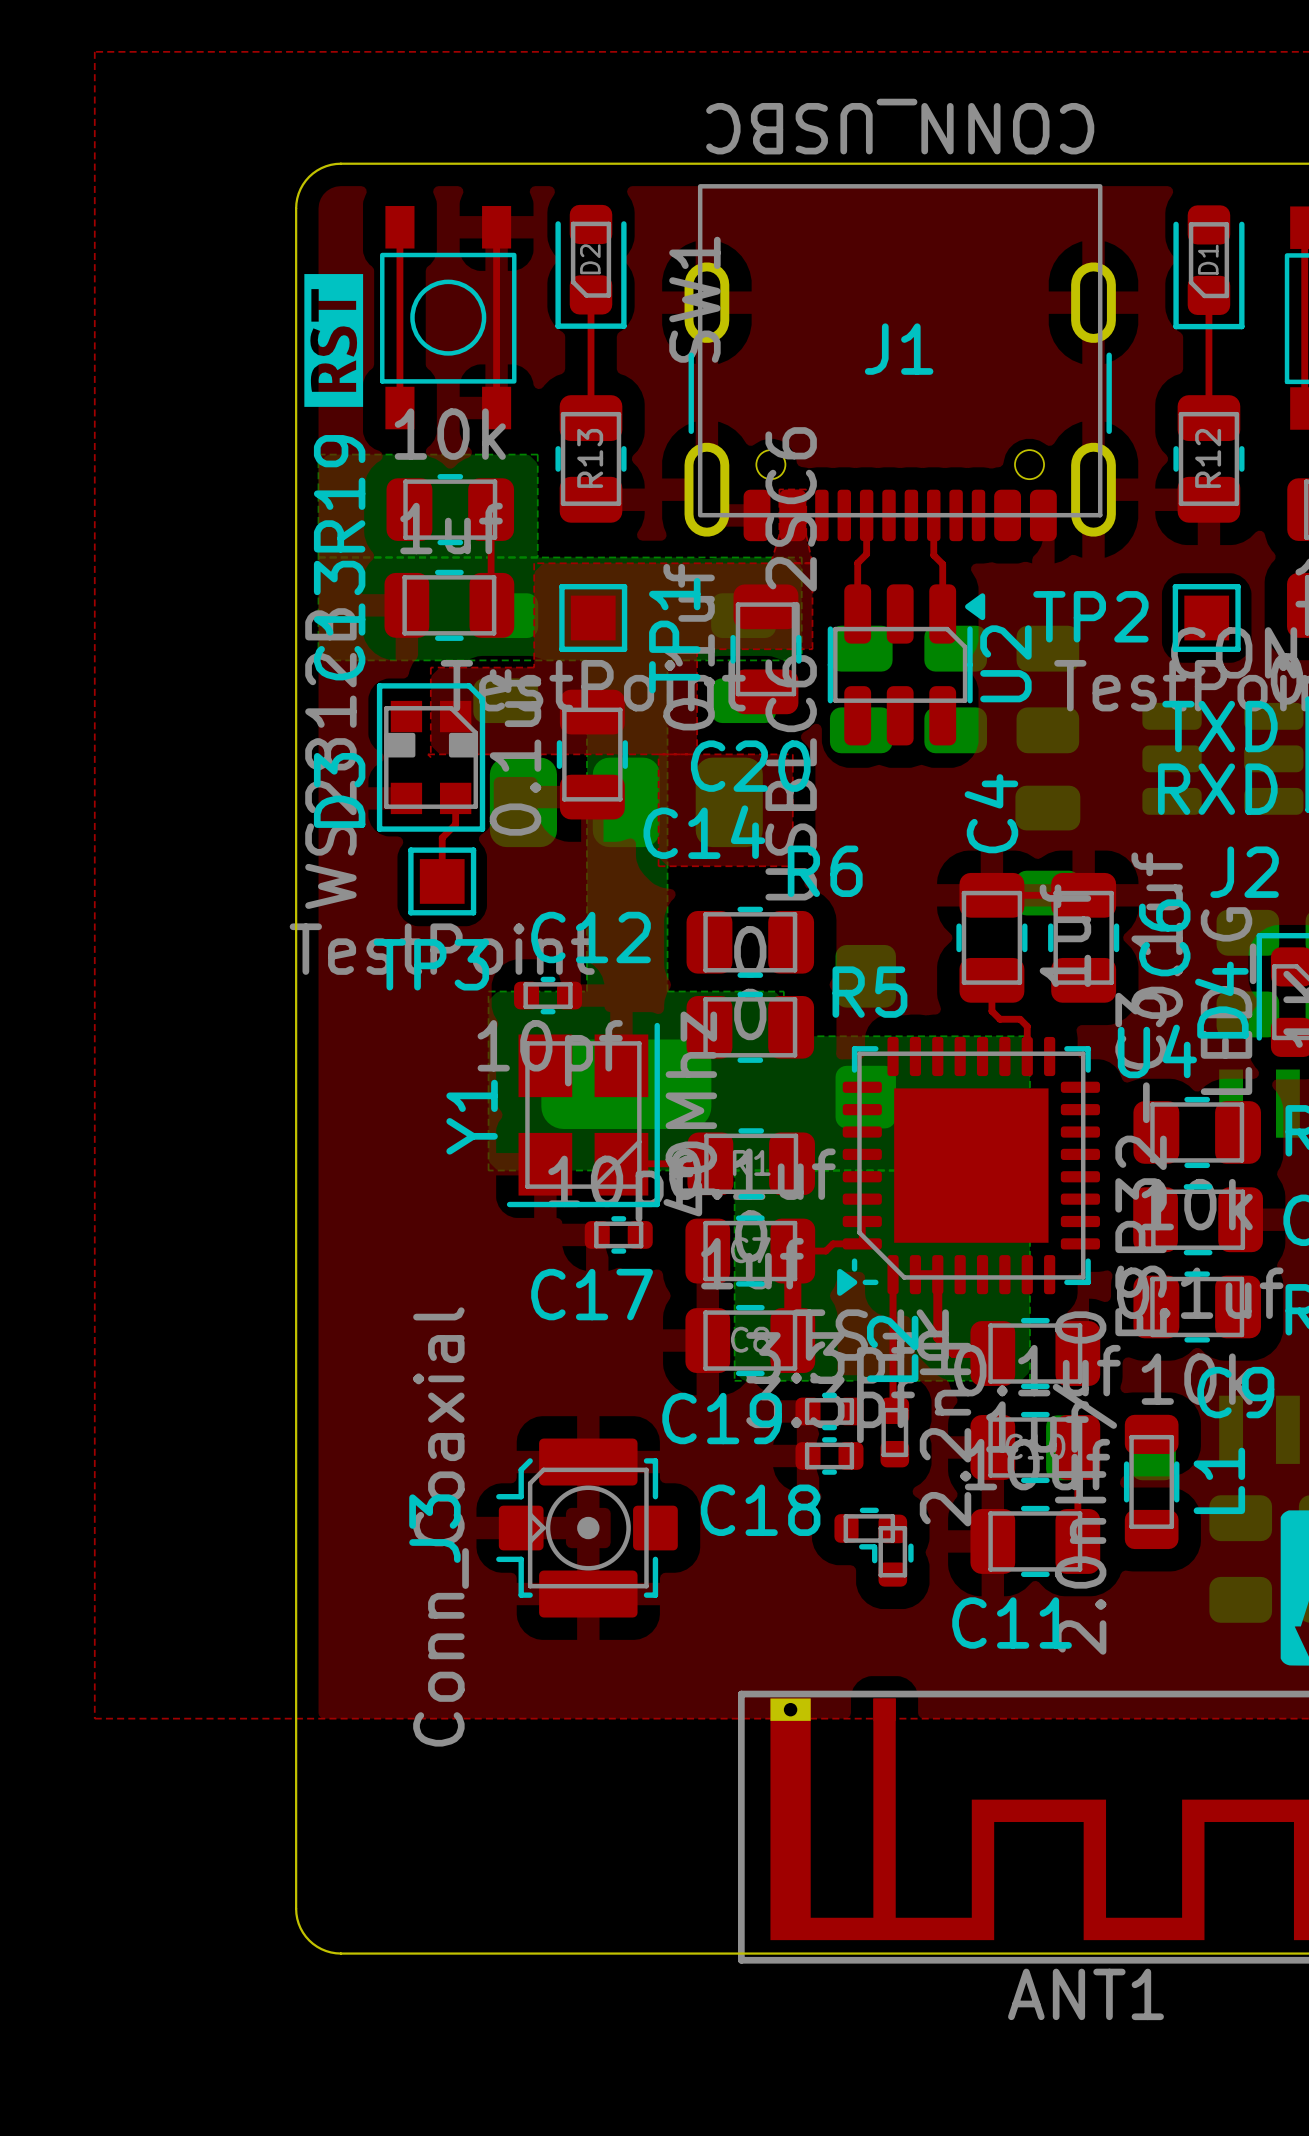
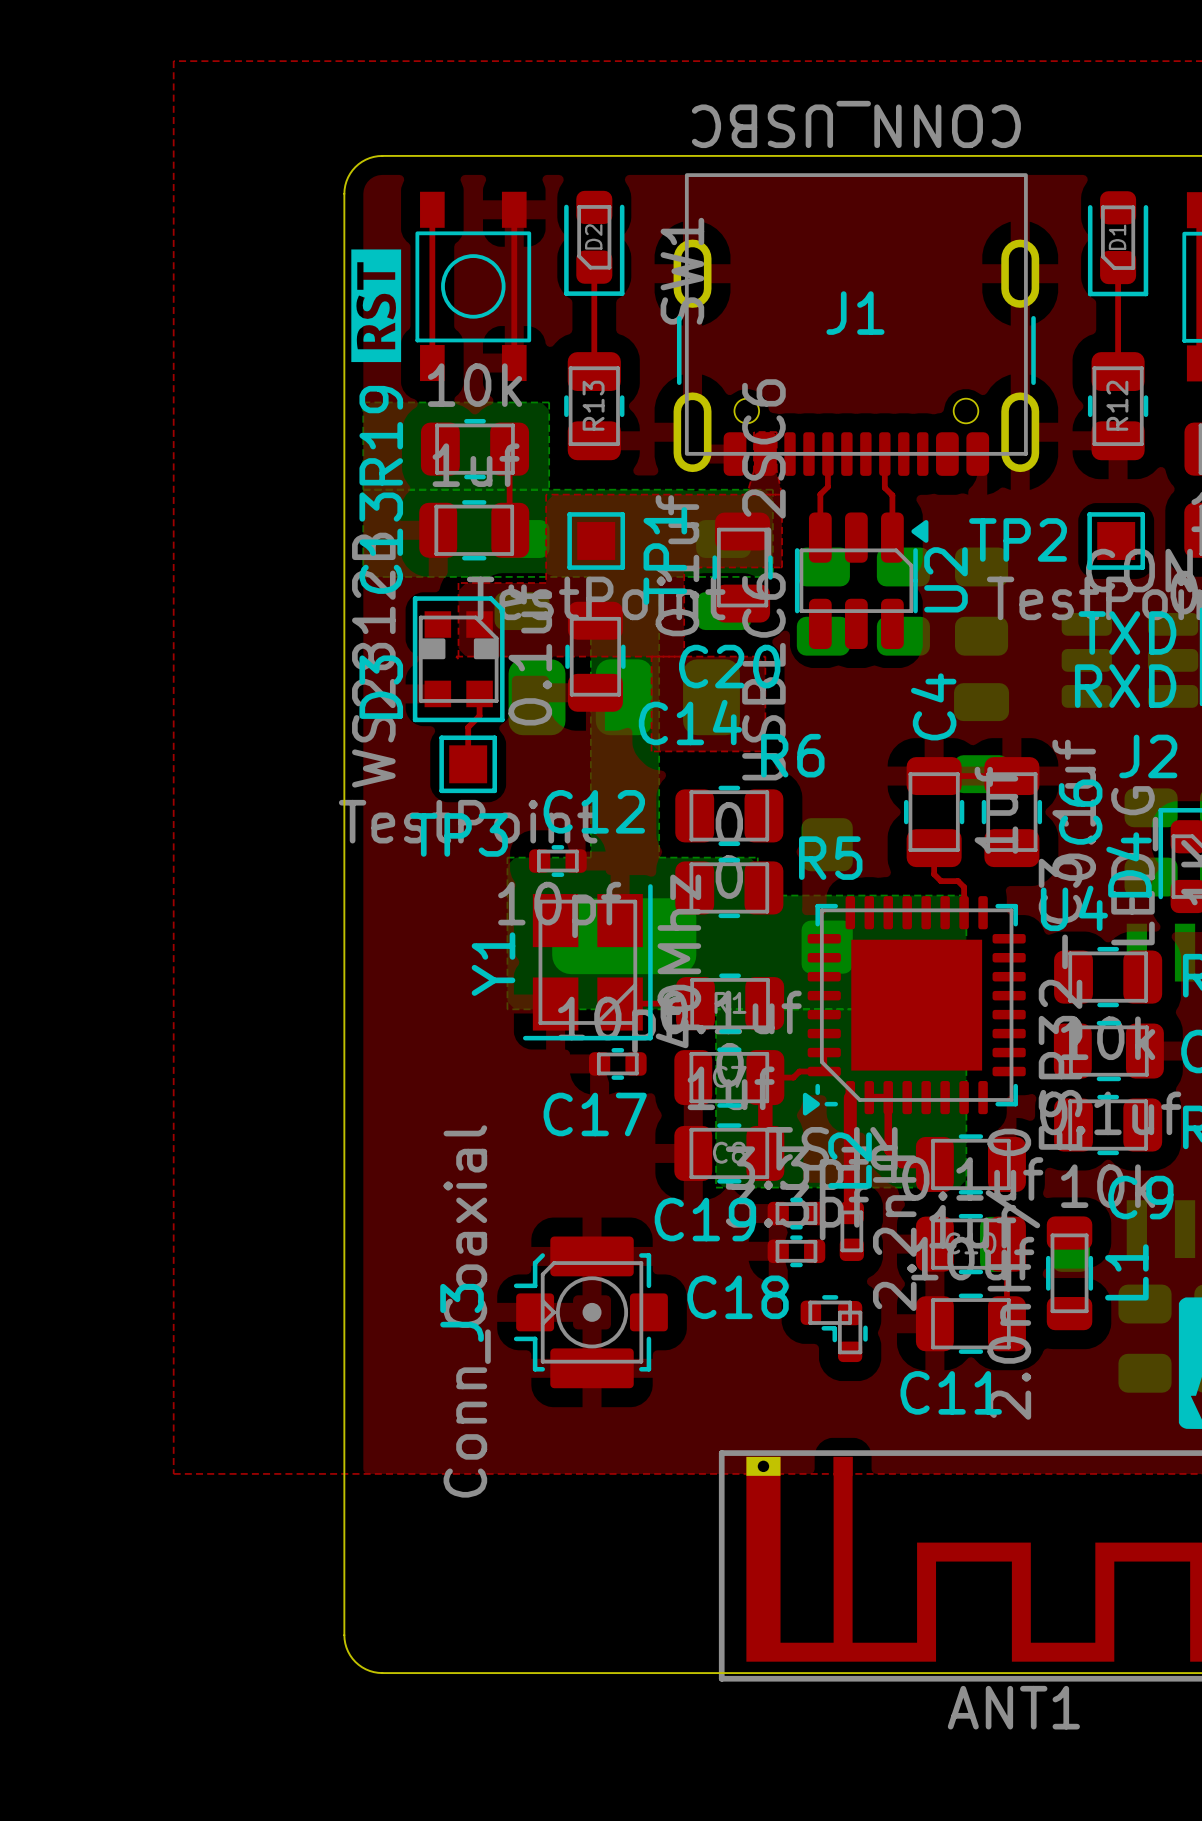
top track width: thin (893, 1274) (893, 1409) -> thick (850, 1097) (850, 1211)

